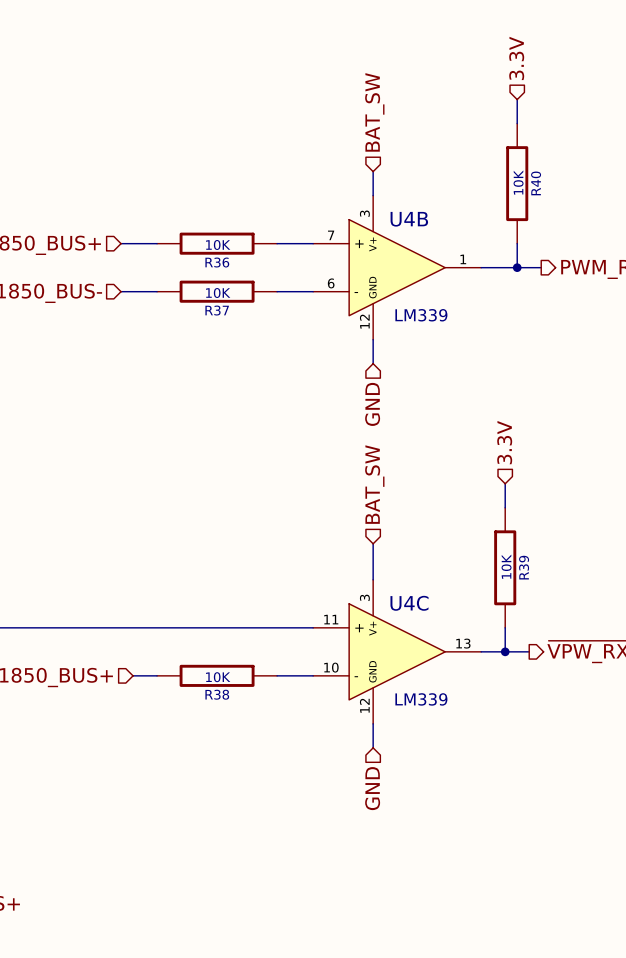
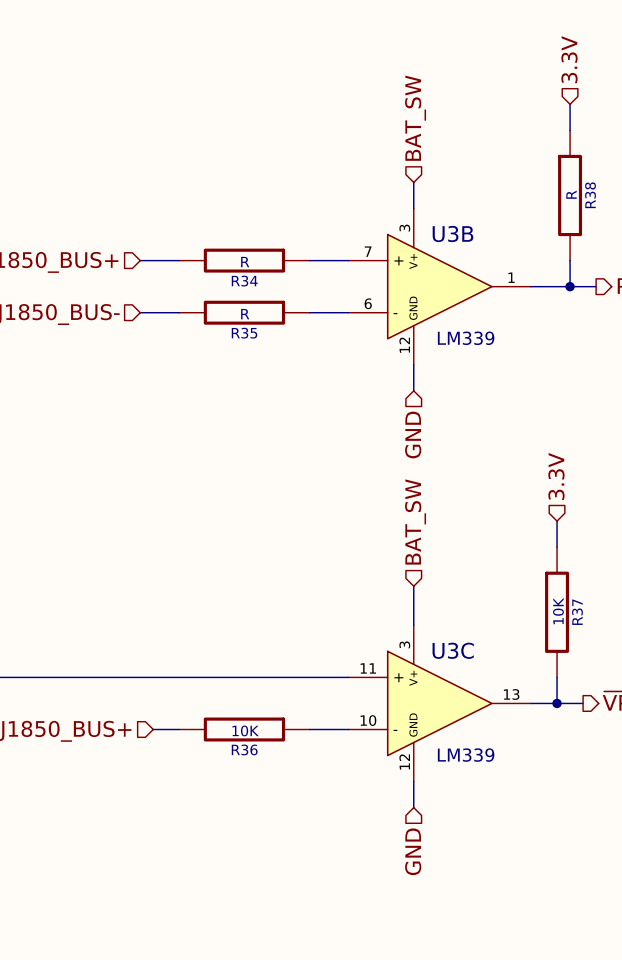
R40 value: 10K (518, 182) -> R (571, 194)
R40 name: R40 (536, 183) -> R38 (590, 195)
U4B name: U4B (409, 219) -> U3B (453, 233)
R36 value: 10K (218, 244) -> R (245, 262)
R36 name: R36 (217, 262) -> R34 (244, 281)
R37 value: 10K (218, 293) -> R (245, 314)
R37 name: R37 (217, 310) -> R35 (244, 333)
R39 name: R39 (524, 567) -> R37 (577, 612)
U4C name: U4C (409, 603) -> U3C (453, 650)
R38 name: R38 (217, 694) -> R36 (244, 749)

